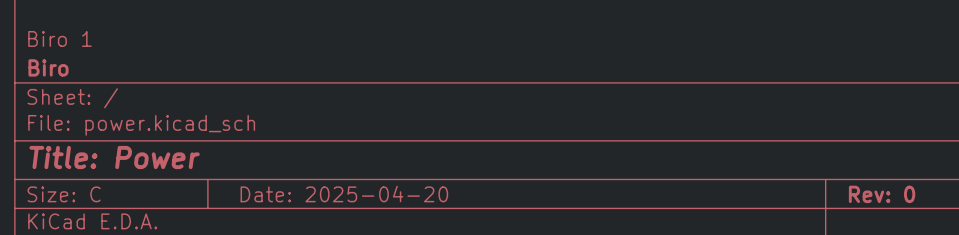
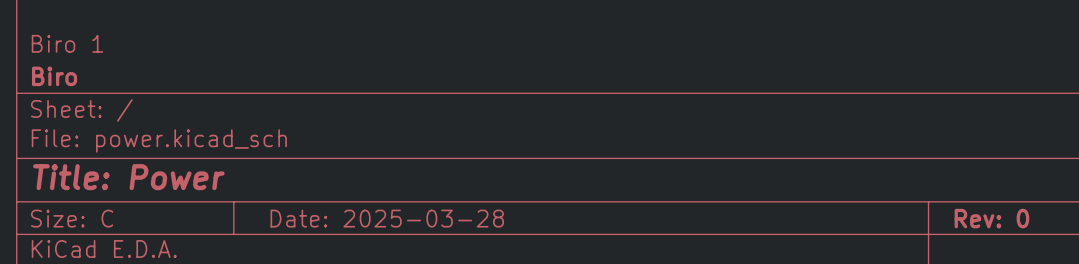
title block: Date: 2025-04-20 (344, 194) -> Date: 2025-03-28 (387, 218)

